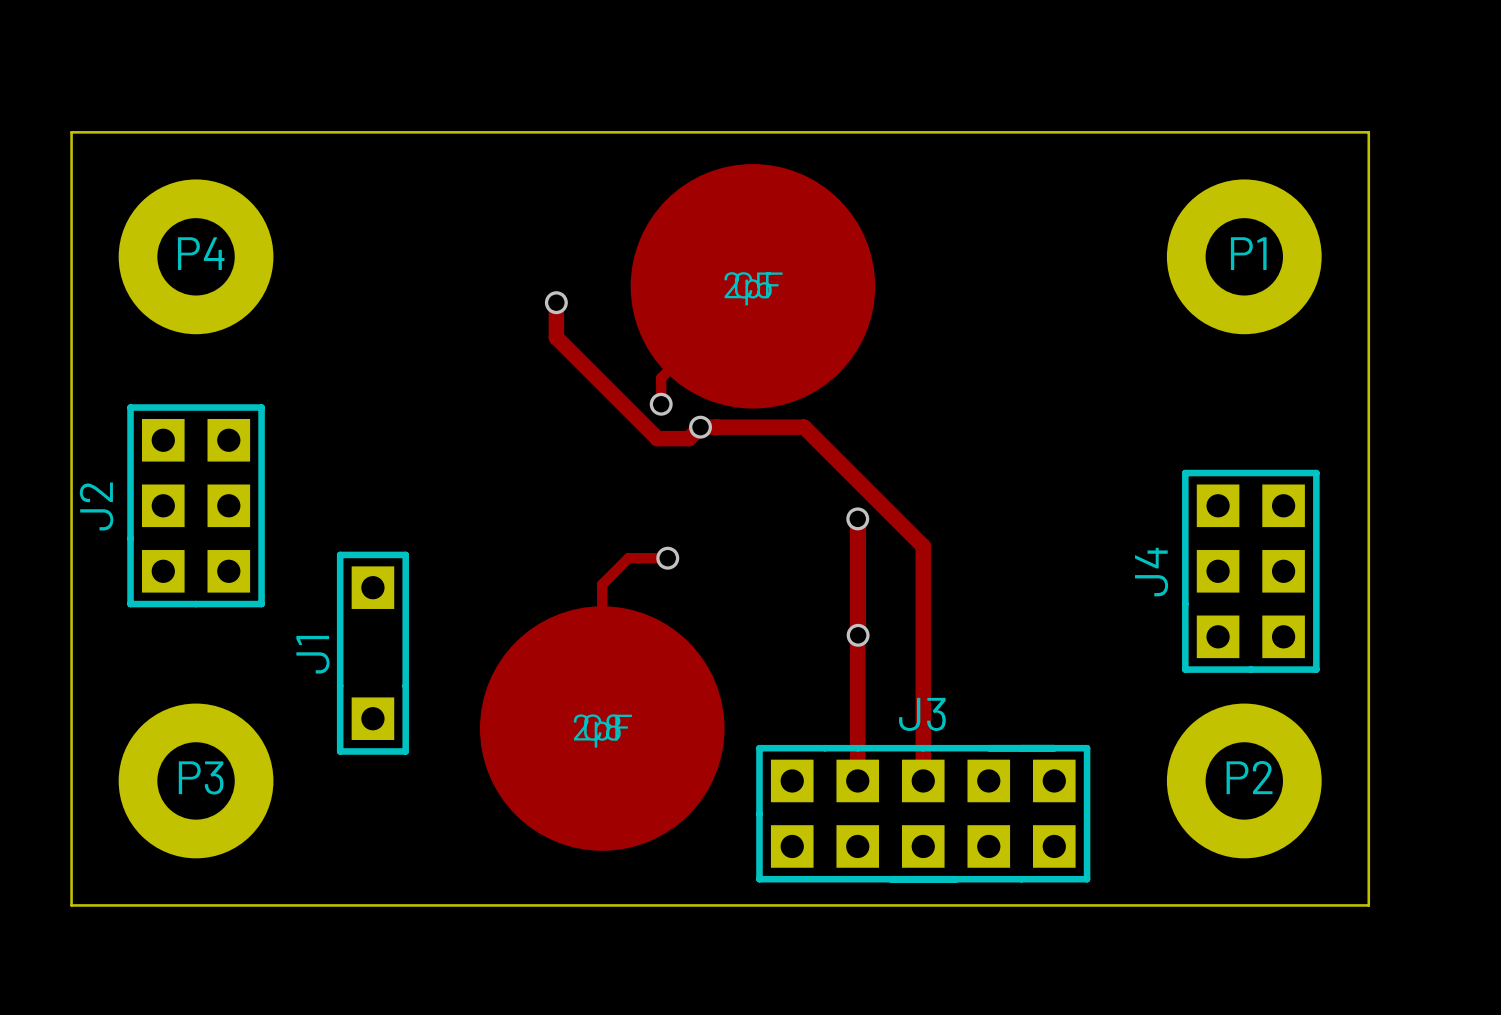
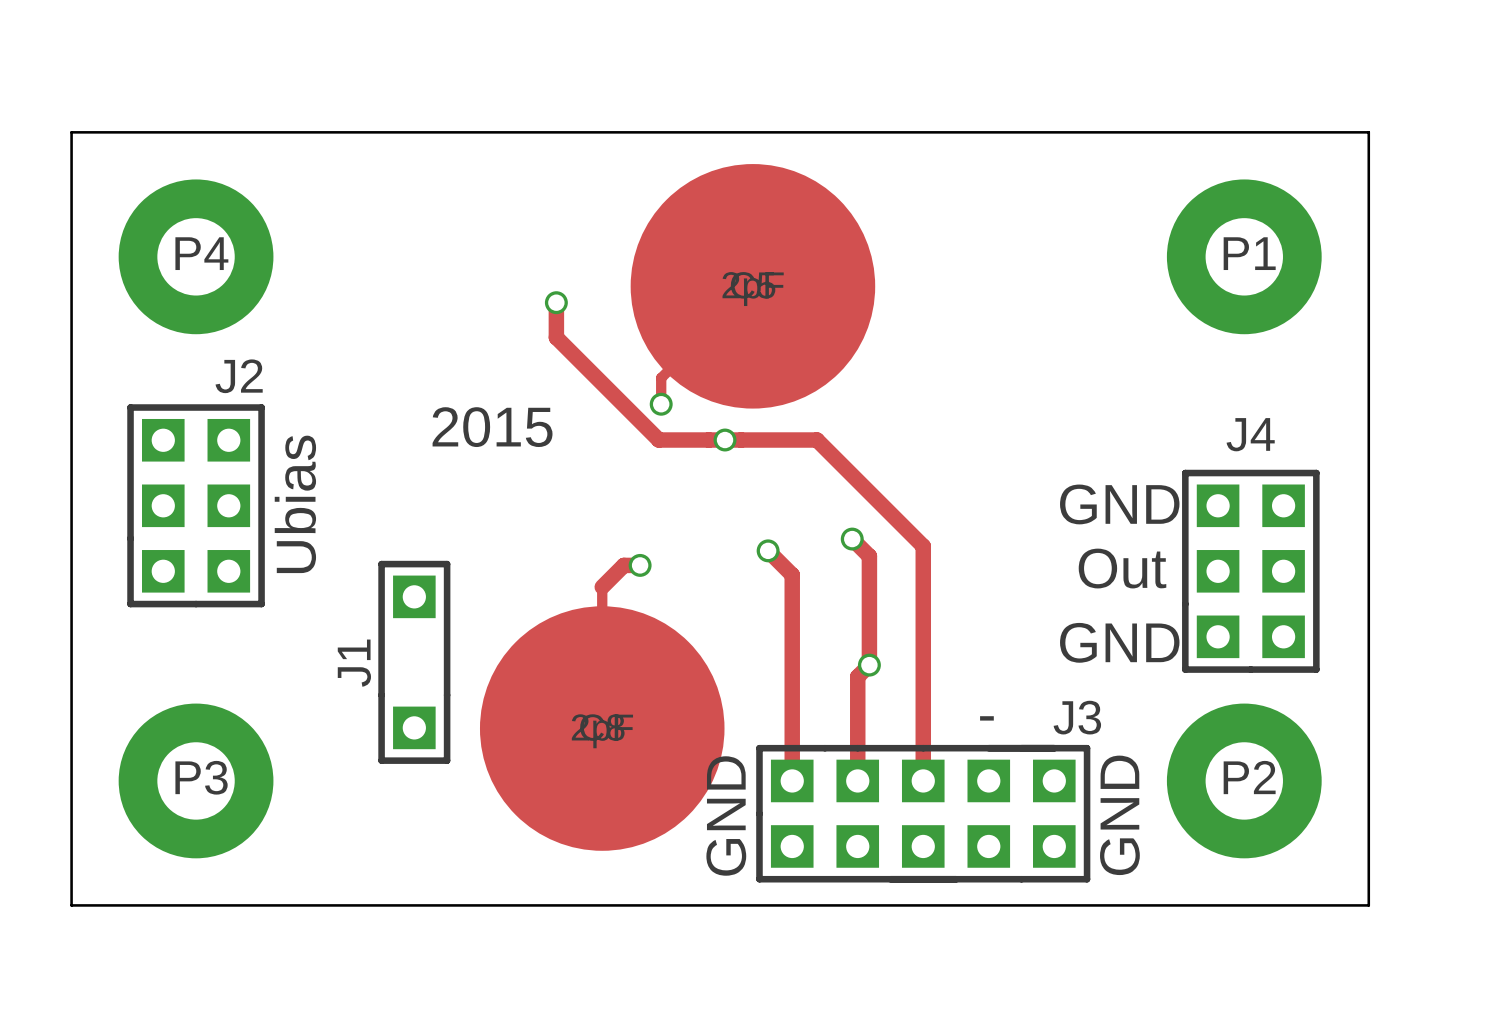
text: none -> 2015 (492, 427)
via position: (700, 427) -> (725, 440)
track: (657, 438) (689, 438) (700, 427) (804, 427) (816, 440) -> (657, 438) (816, 440)
text: none -> Ubias (295, 504)
text: none -> GND (1119, 504)
J2 name rotation: 0° (96, 506) -> 90° clockwise (239, 376)
J2 name position: J2 (96, 506) -> J2 (239, 376)
via position: (857, 518) -> (852, 539)
track: none -> (768, 550) (792, 574) (792, 780)
via: none -> (768, 550)
track: (667, 558) (628, 558) (602, 584) (602, 587) -> (640, 565) (623, 565) (602, 587)
via position: (667, 558) -> (640, 565)
text: none -> Out (1122, 568)
J4 name rotation: 0° (1151, 572) -> 90° clockwise (1250, 434)
J4 name position: J4 (1151, 572) -> J4 (1250, 434)
track: (858, 635) (857, 518) (857, 676) -> (852, 539) (869, 556) (869, 665) (857, 676)
via position: (858, 635) -> (869, 665)
text: none -> GND (1119, 642)
J1 position: (372, 653) -> (414, 662)
J3 name position: J3 (922, 714) -> J3 (1077, 717)
text: none -> - (986, 718)
text: none -> GND (726, 816)
text: none -> GND (1119, 815)

